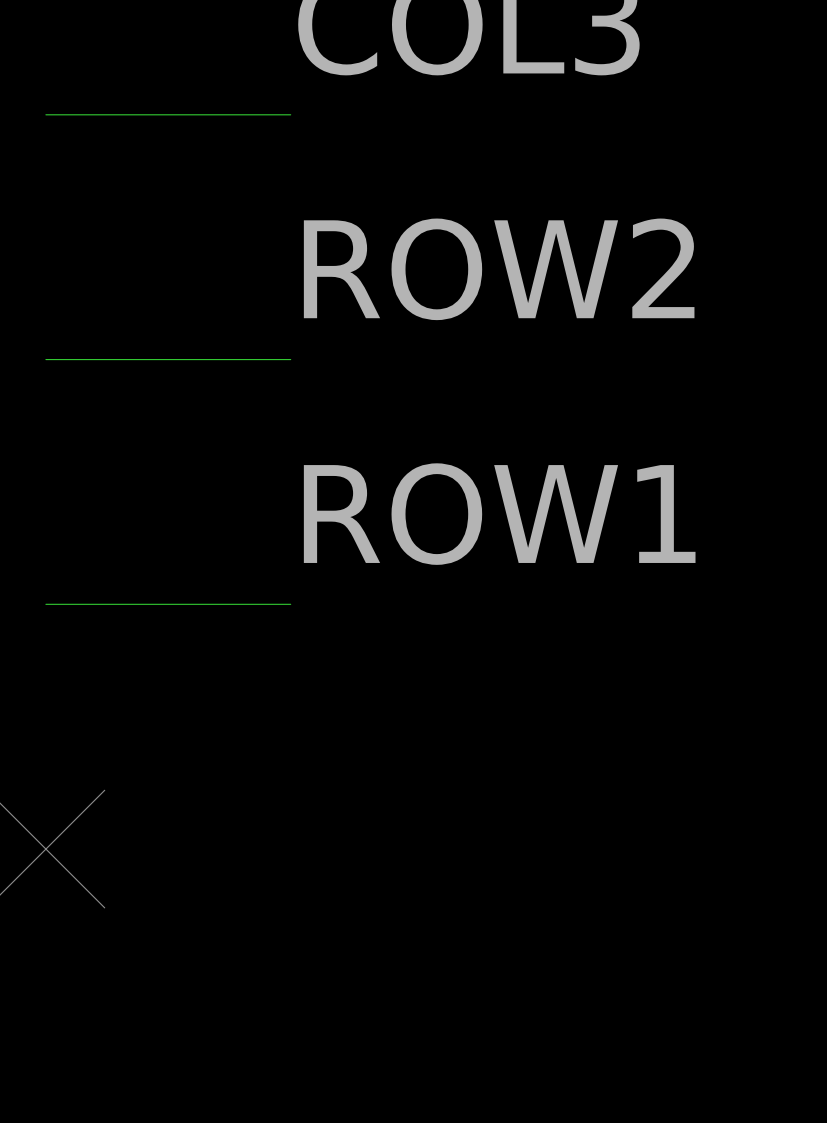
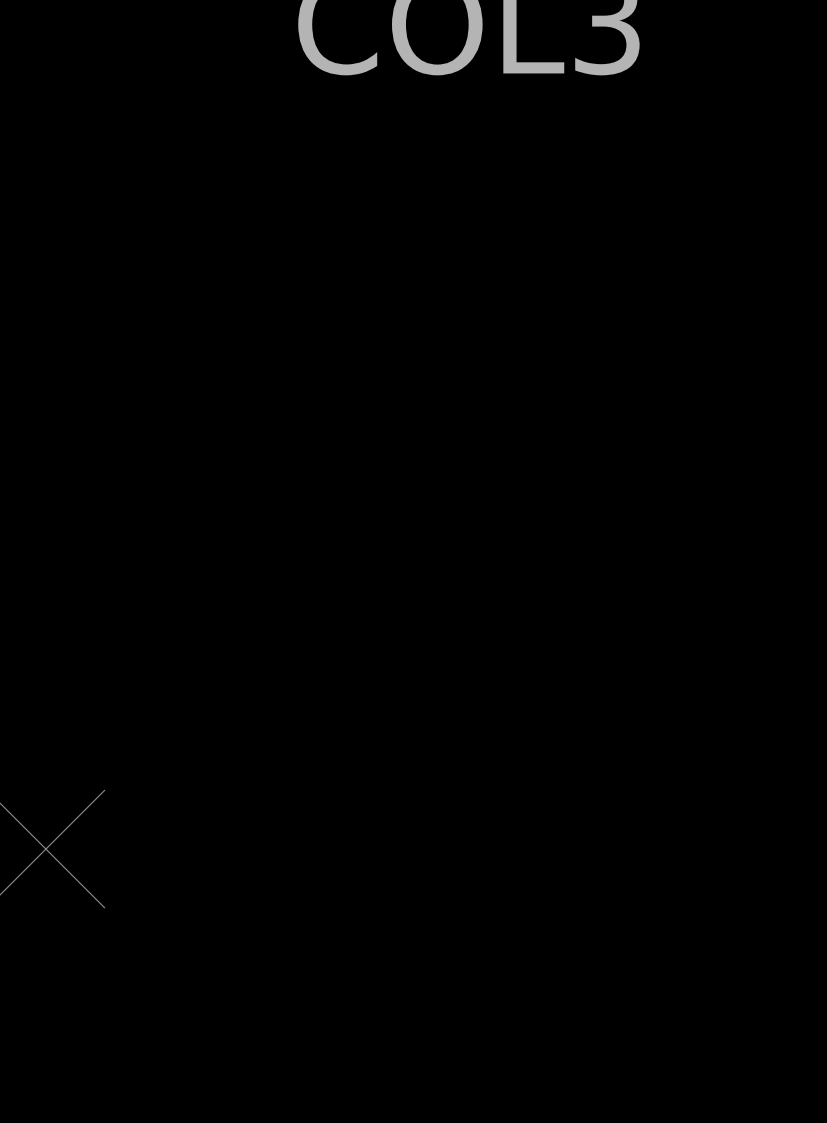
wire: (45, 114) (290, 114) -> none
label: ROW2 (499, 269) -> none
wire: (45, 359) (290, 359) -> none
label: ROW1 (499, 514) -> none
wire: (45, 604) (290, 604) -> none

